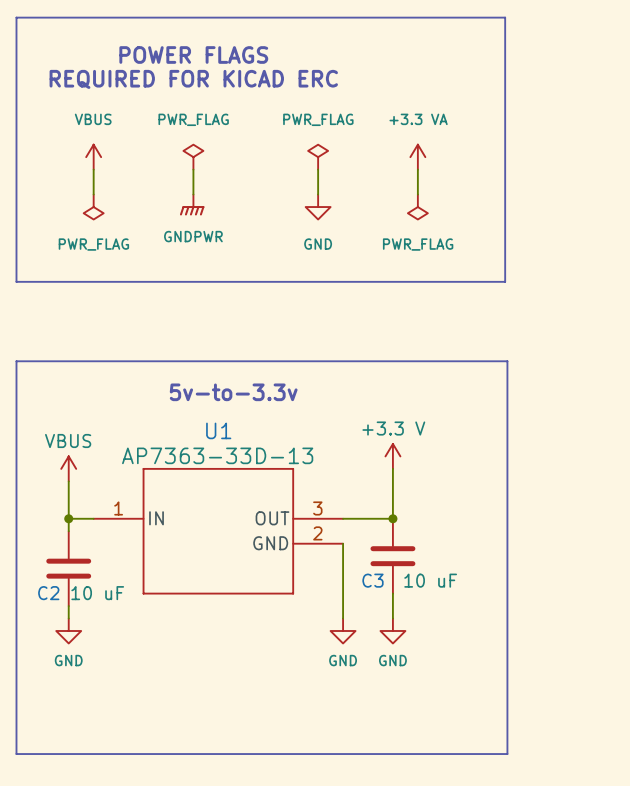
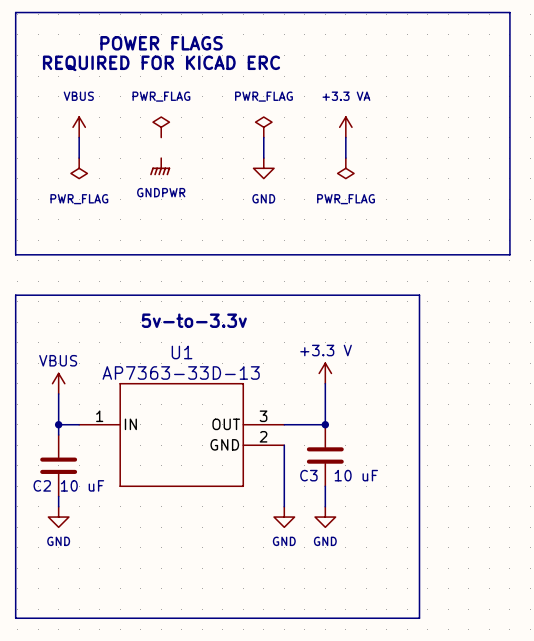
line: (505, 17) (505, 281) (16, 281) -> (417, 12) (509, 12) (509, 254) (15, 254) (15, 229)
wire: (193, 169) (193, 194) -> none

